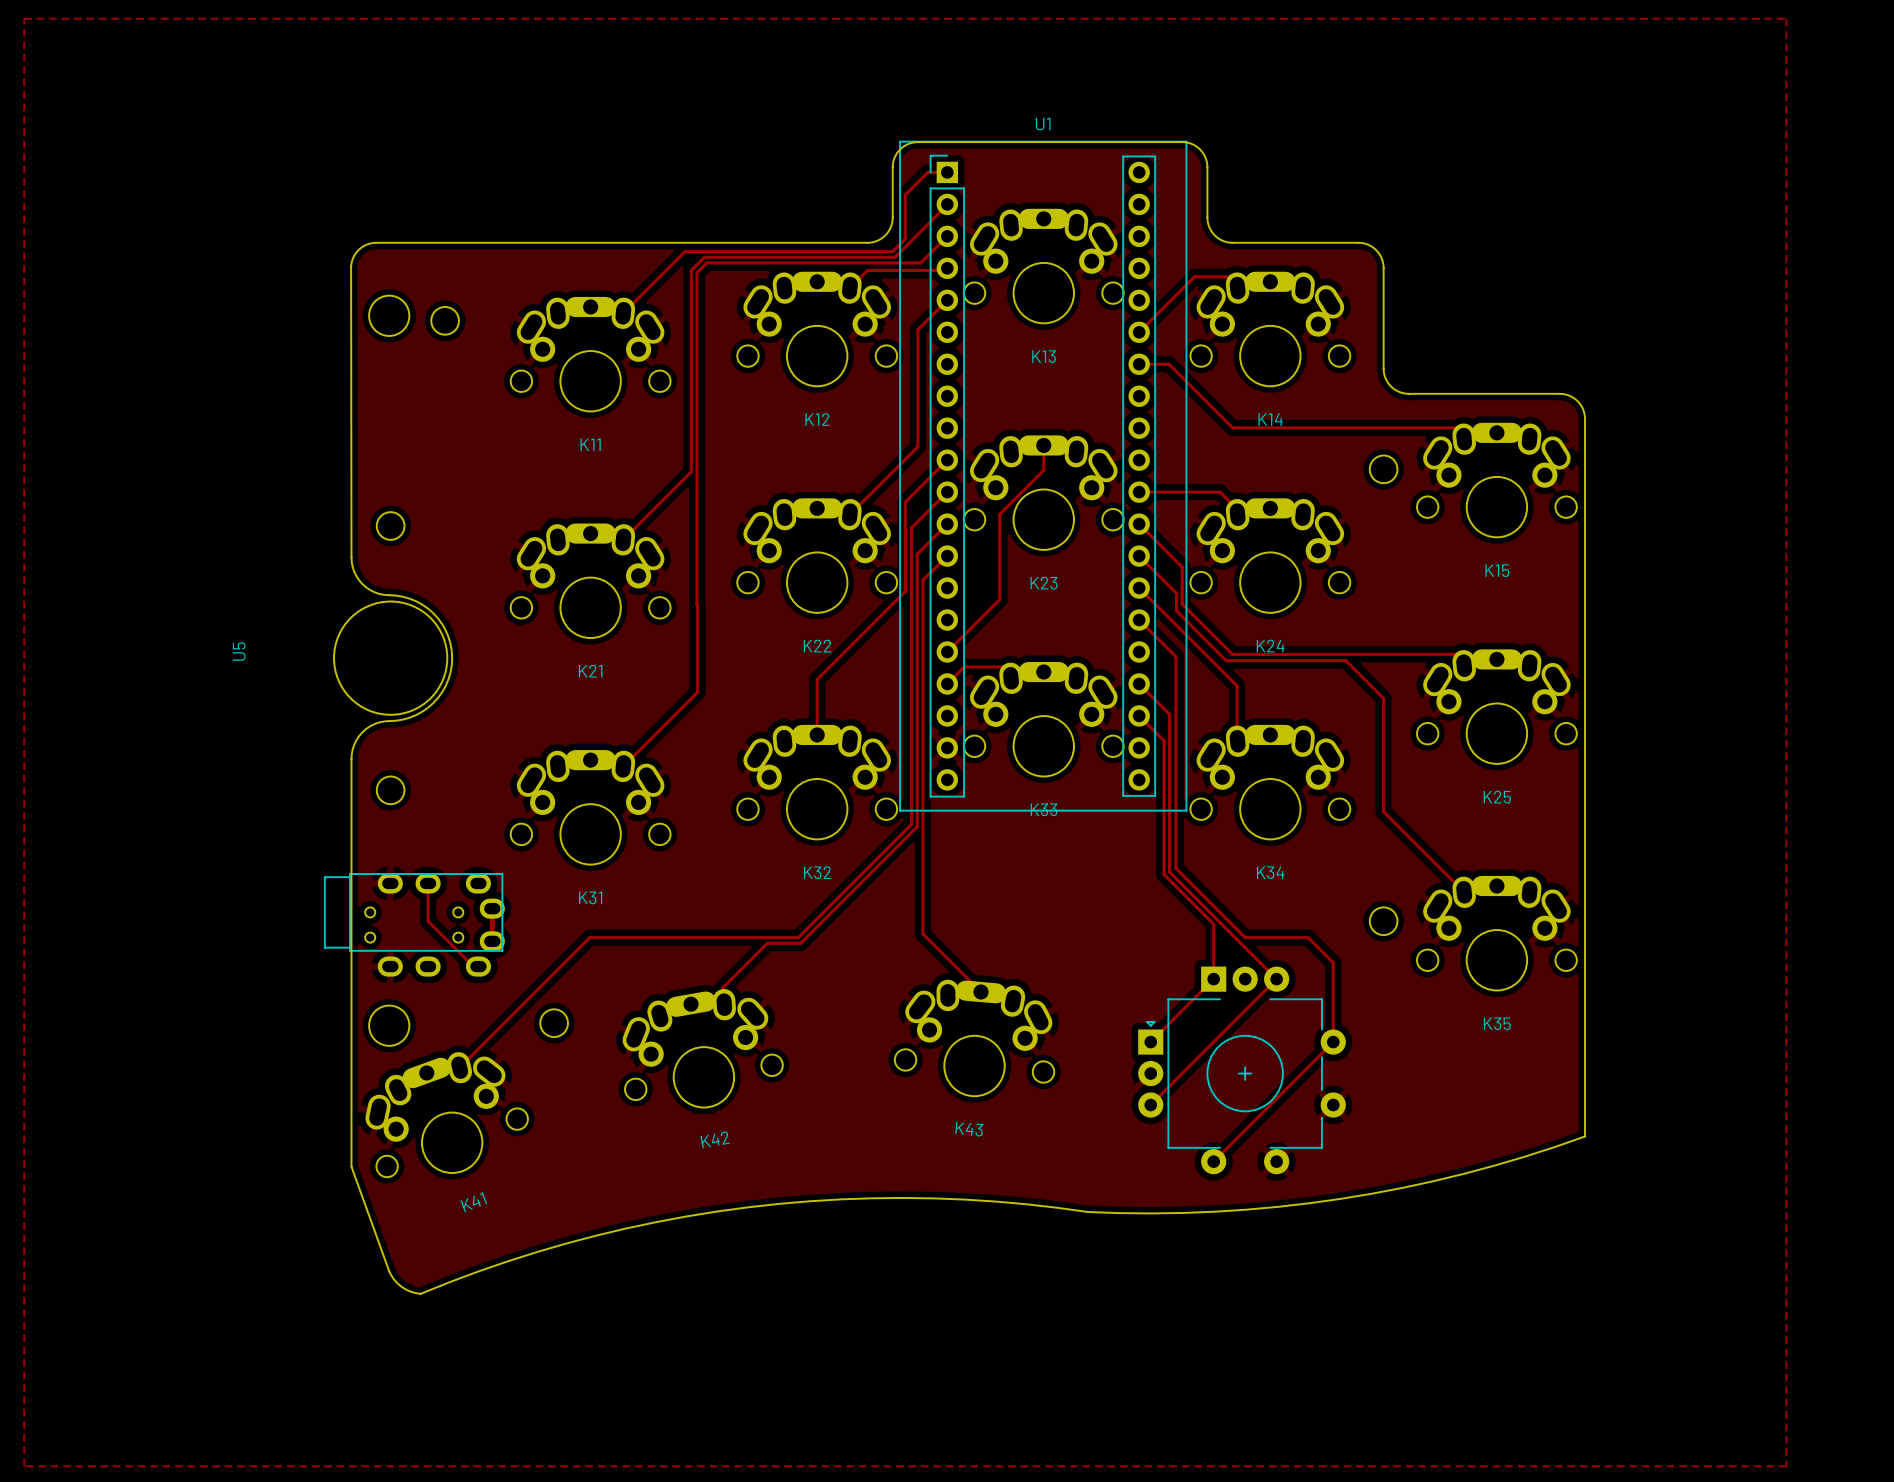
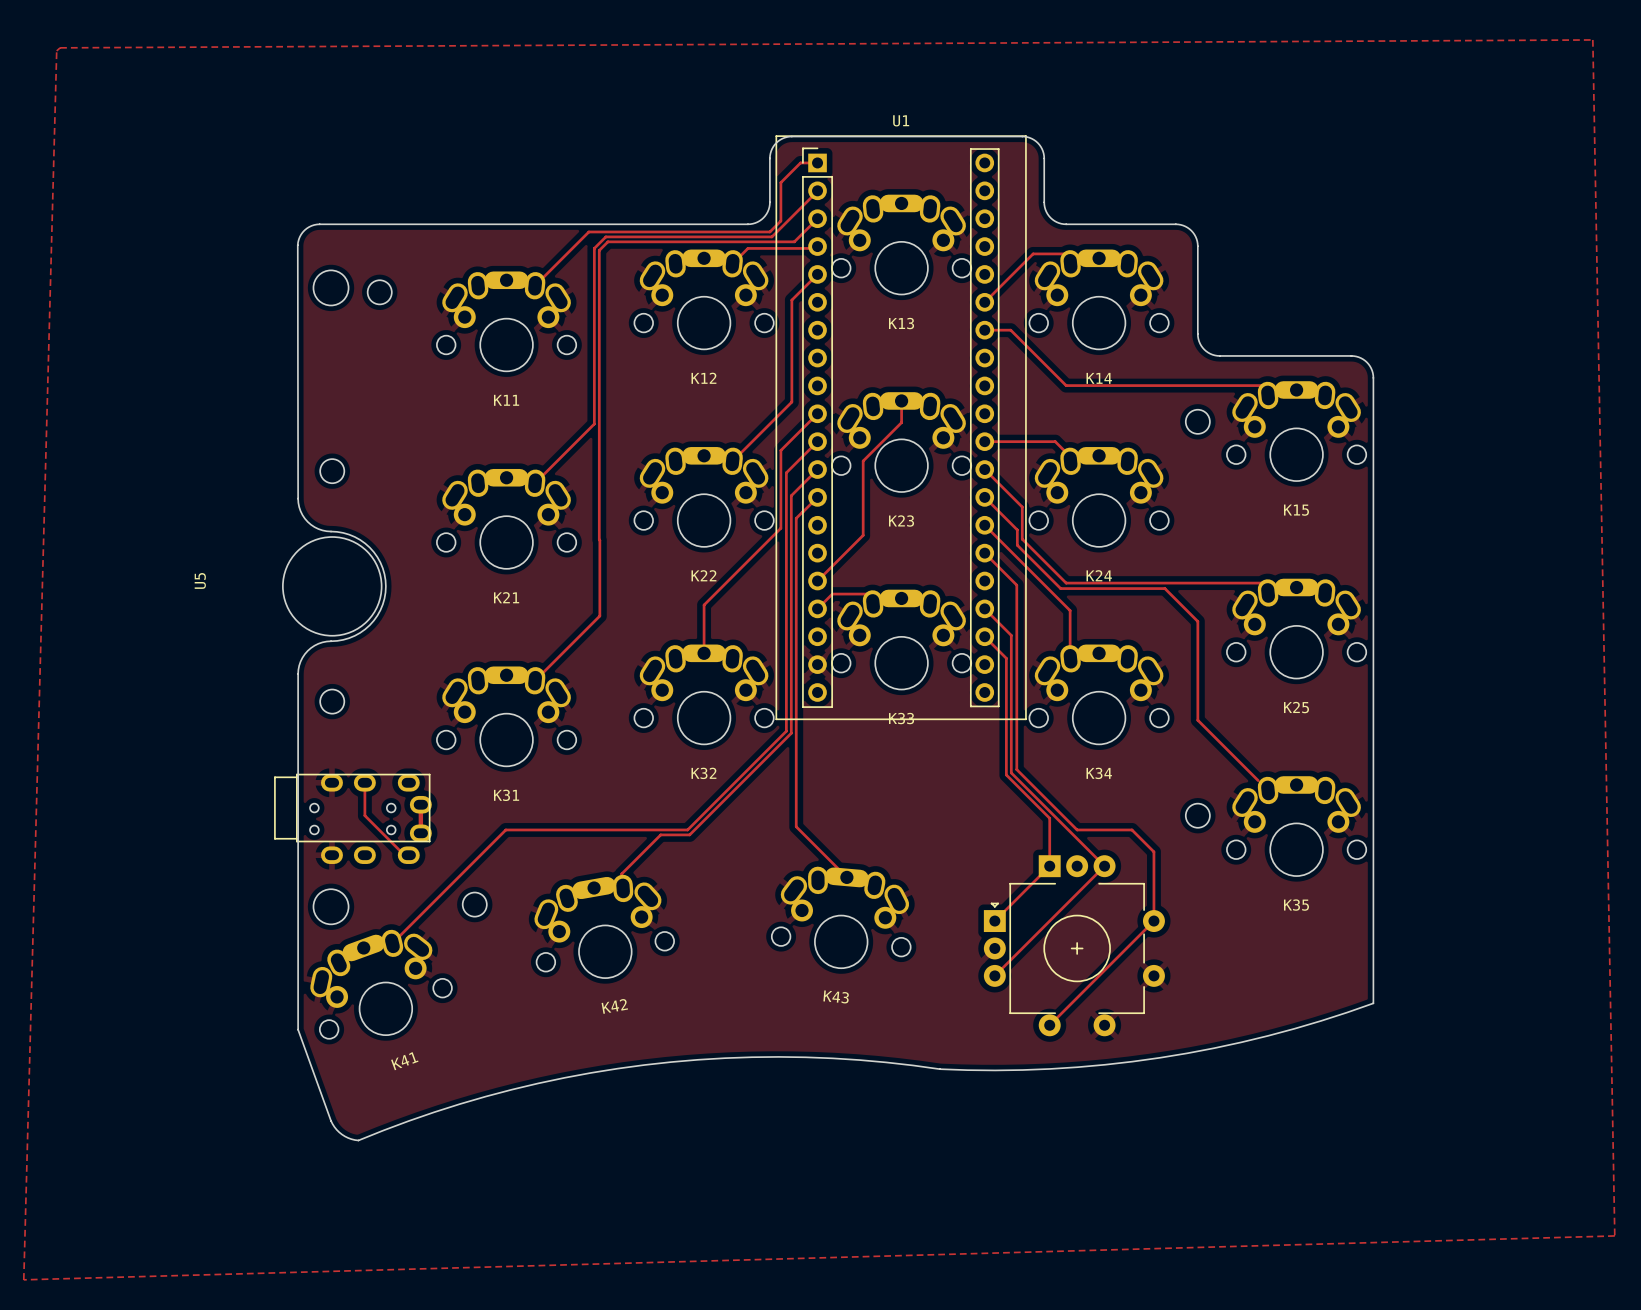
zone outline: (24, 18) (24, 1466) (1786, 1466) (1786, 18) (24, 18) -> (1592, 39) (60, 47) (56, 50) (23, 1279) (1614, 1235) (1592, 39)

